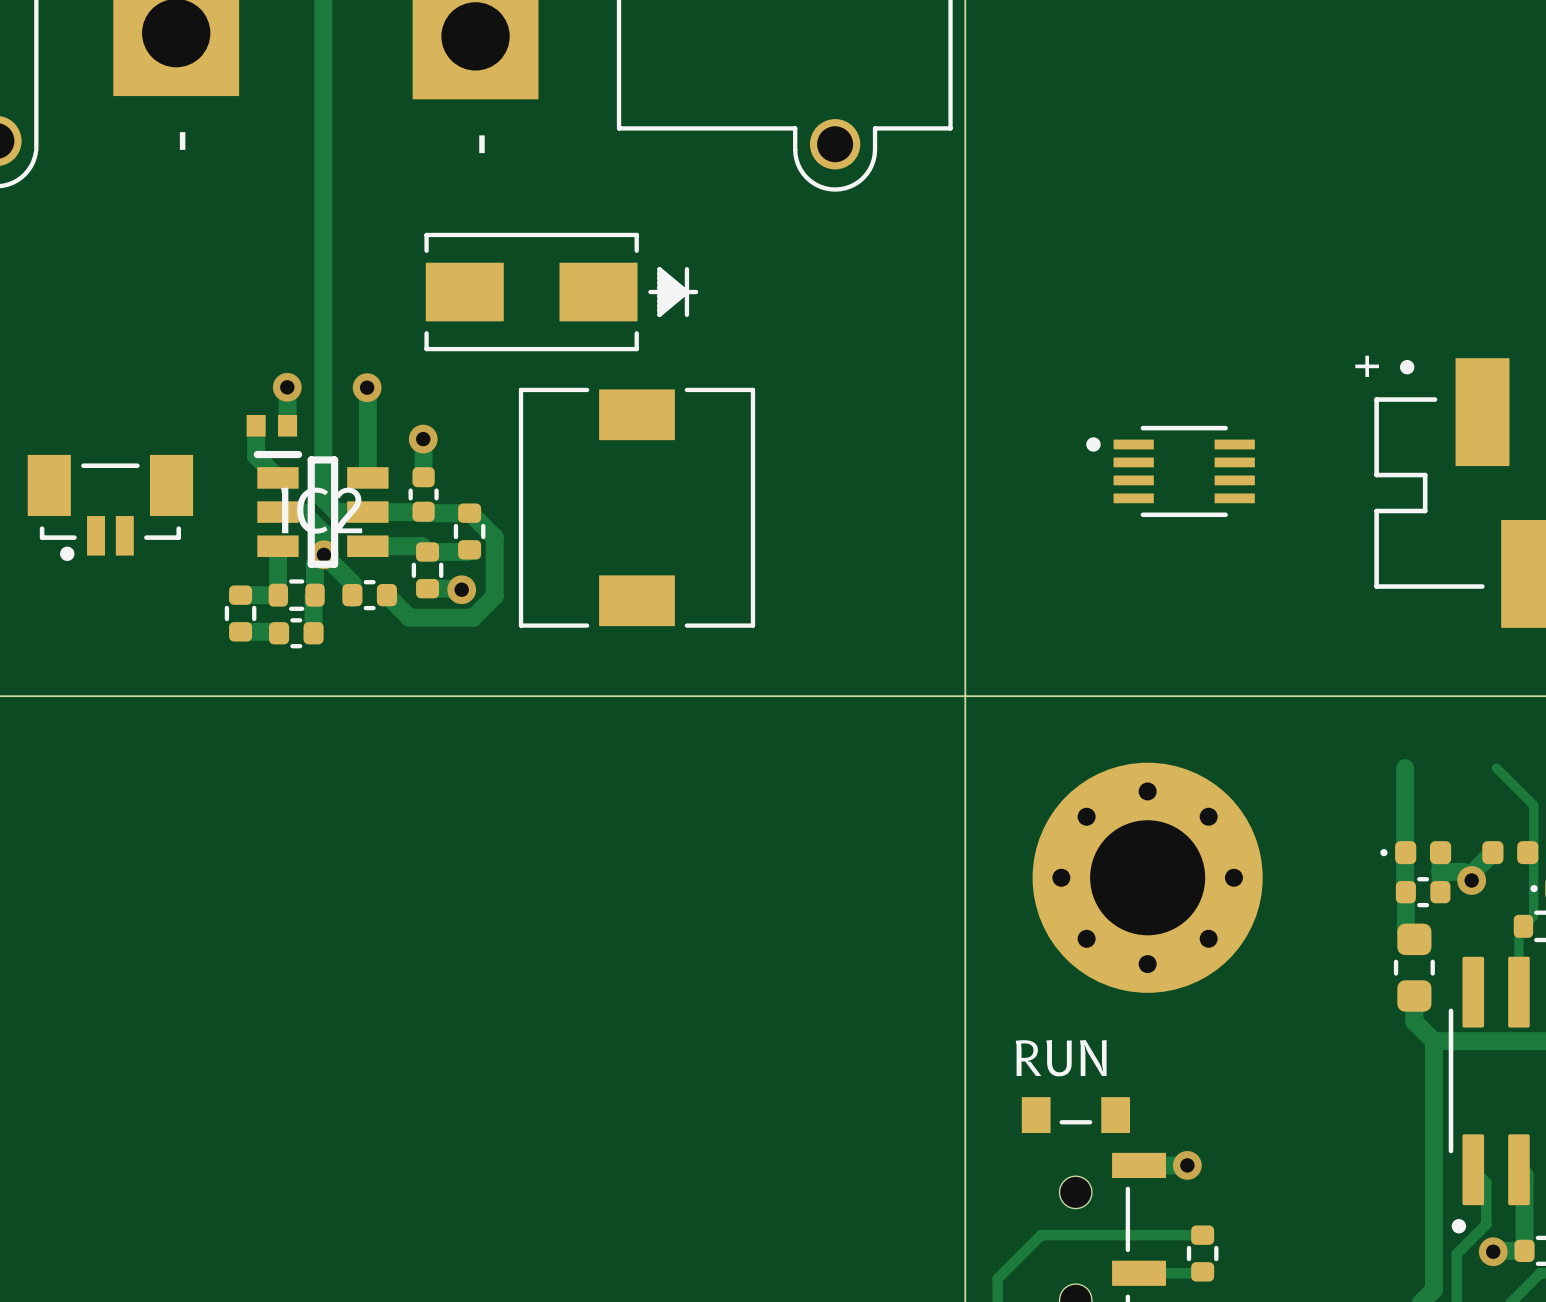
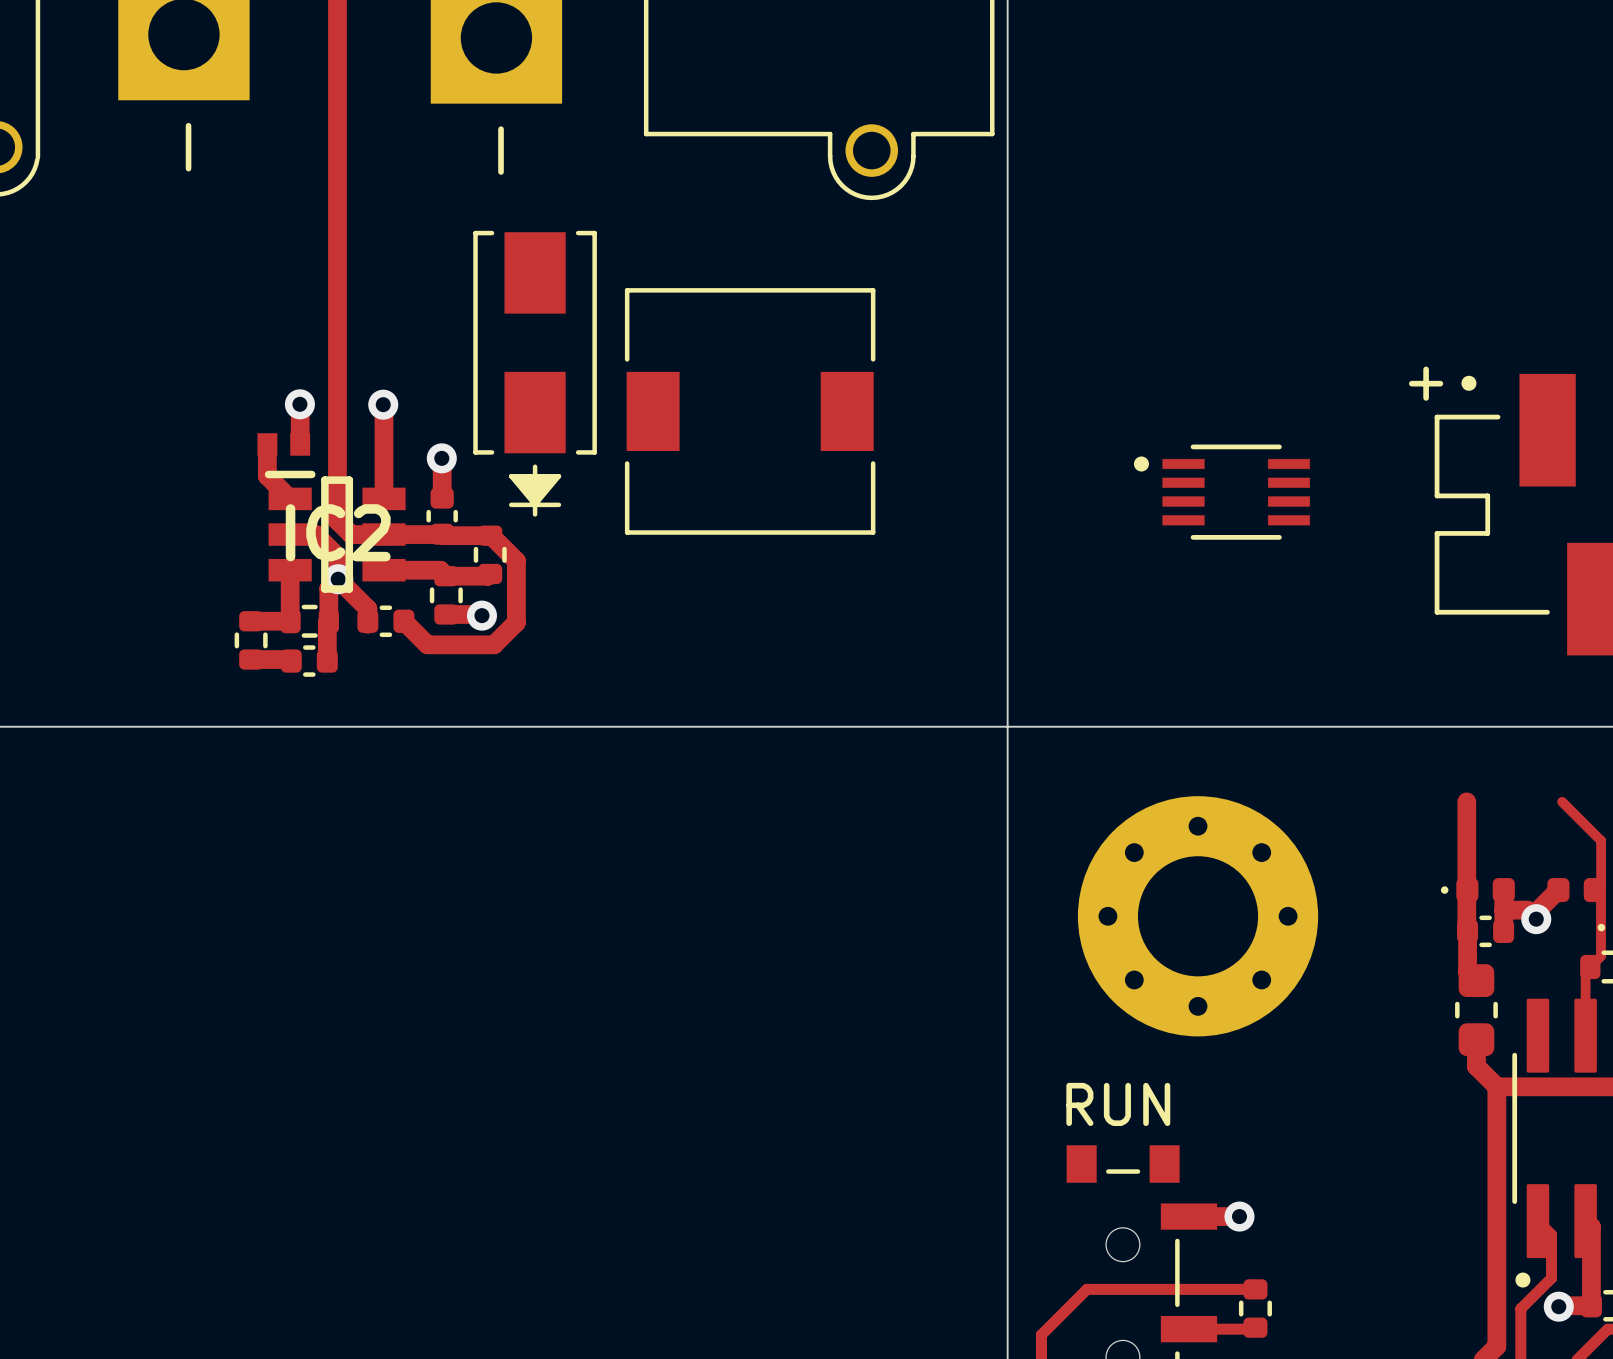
part rotation: 0° (561, 292) -> 90° clockwise (535, 373)
part: (110, 507) -> none
part rotation: 0° (637, 507) -> 90° clockwise (750, 411)

